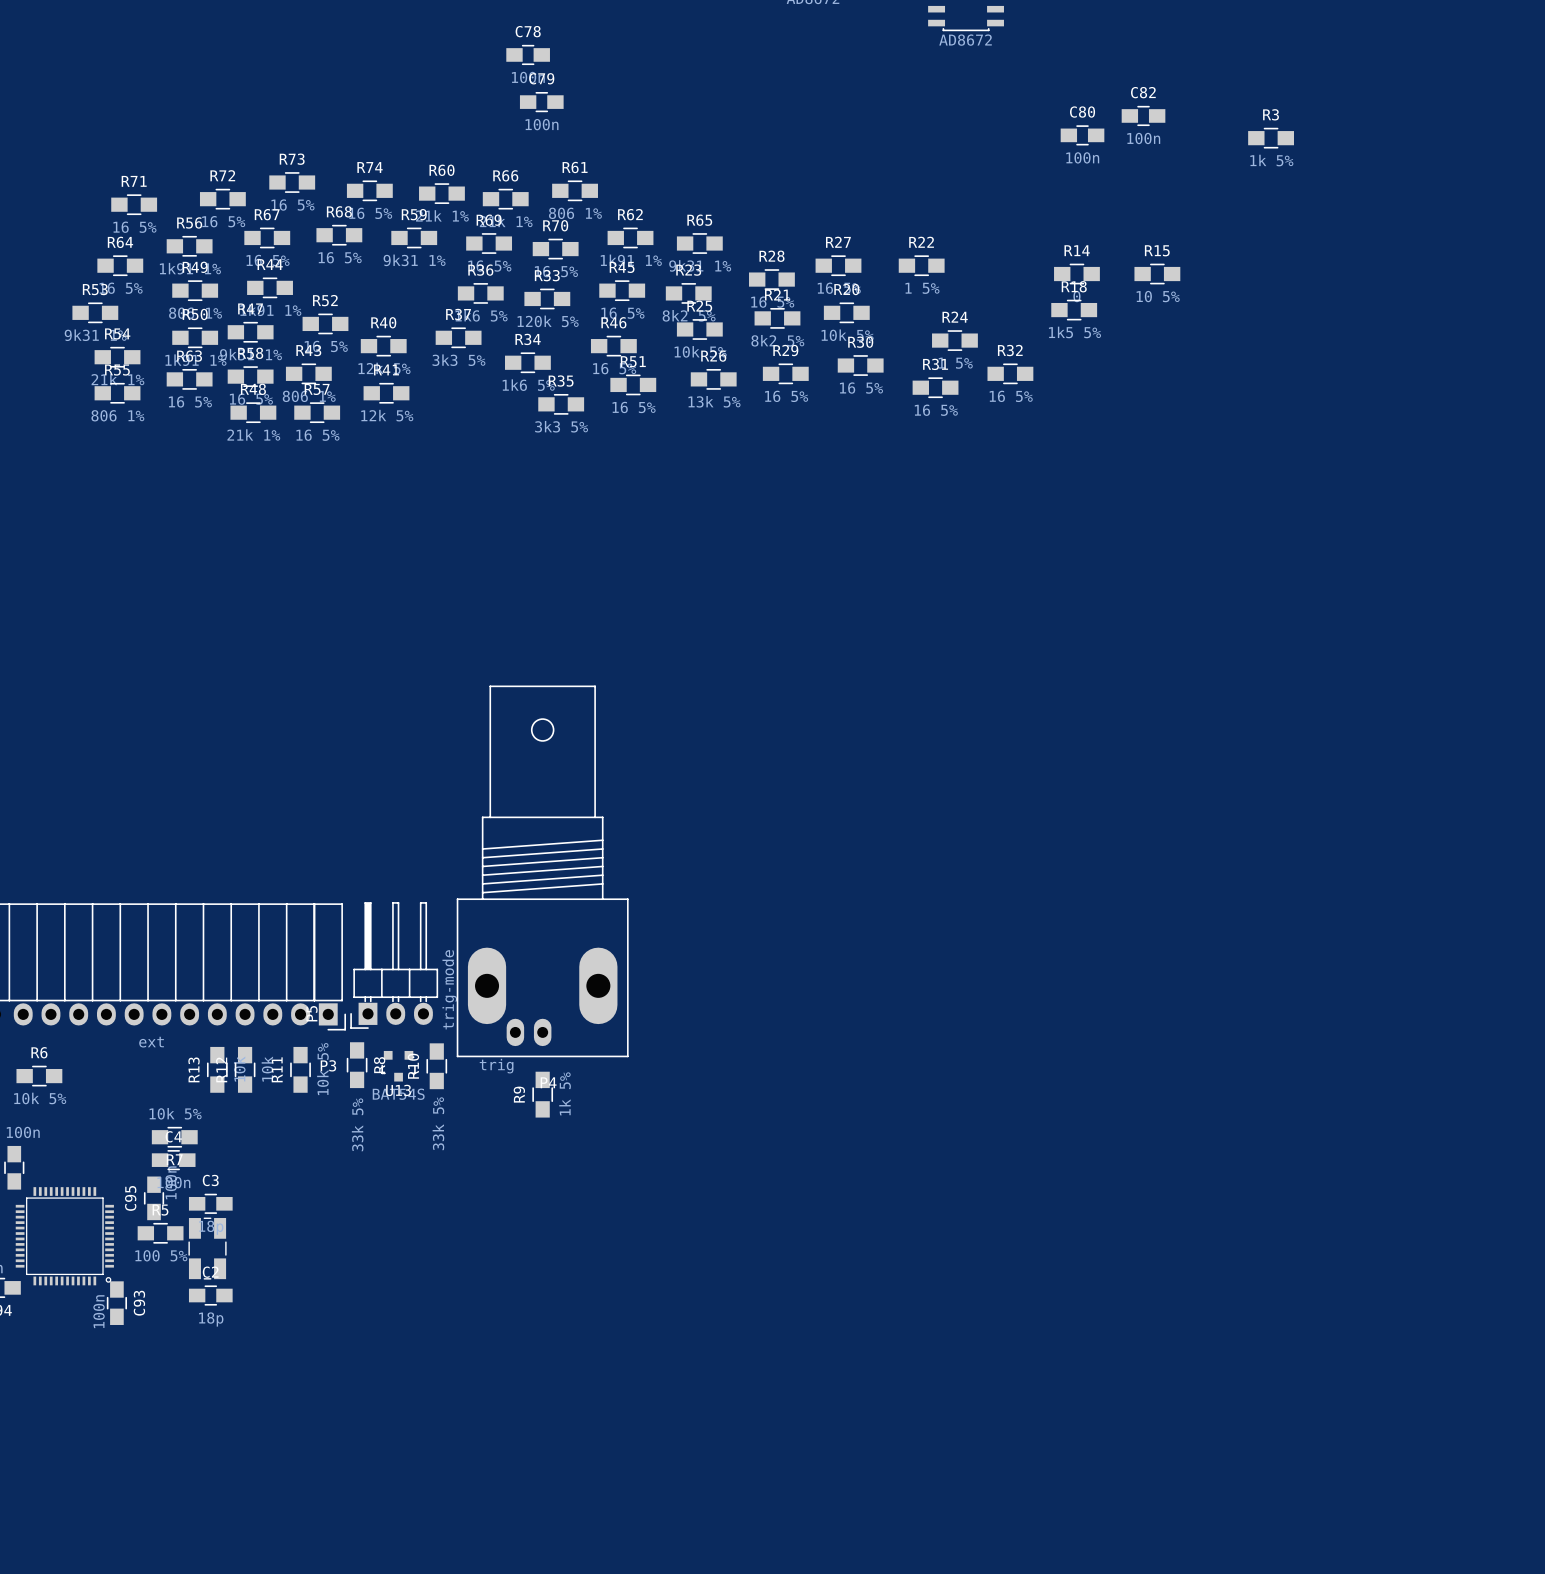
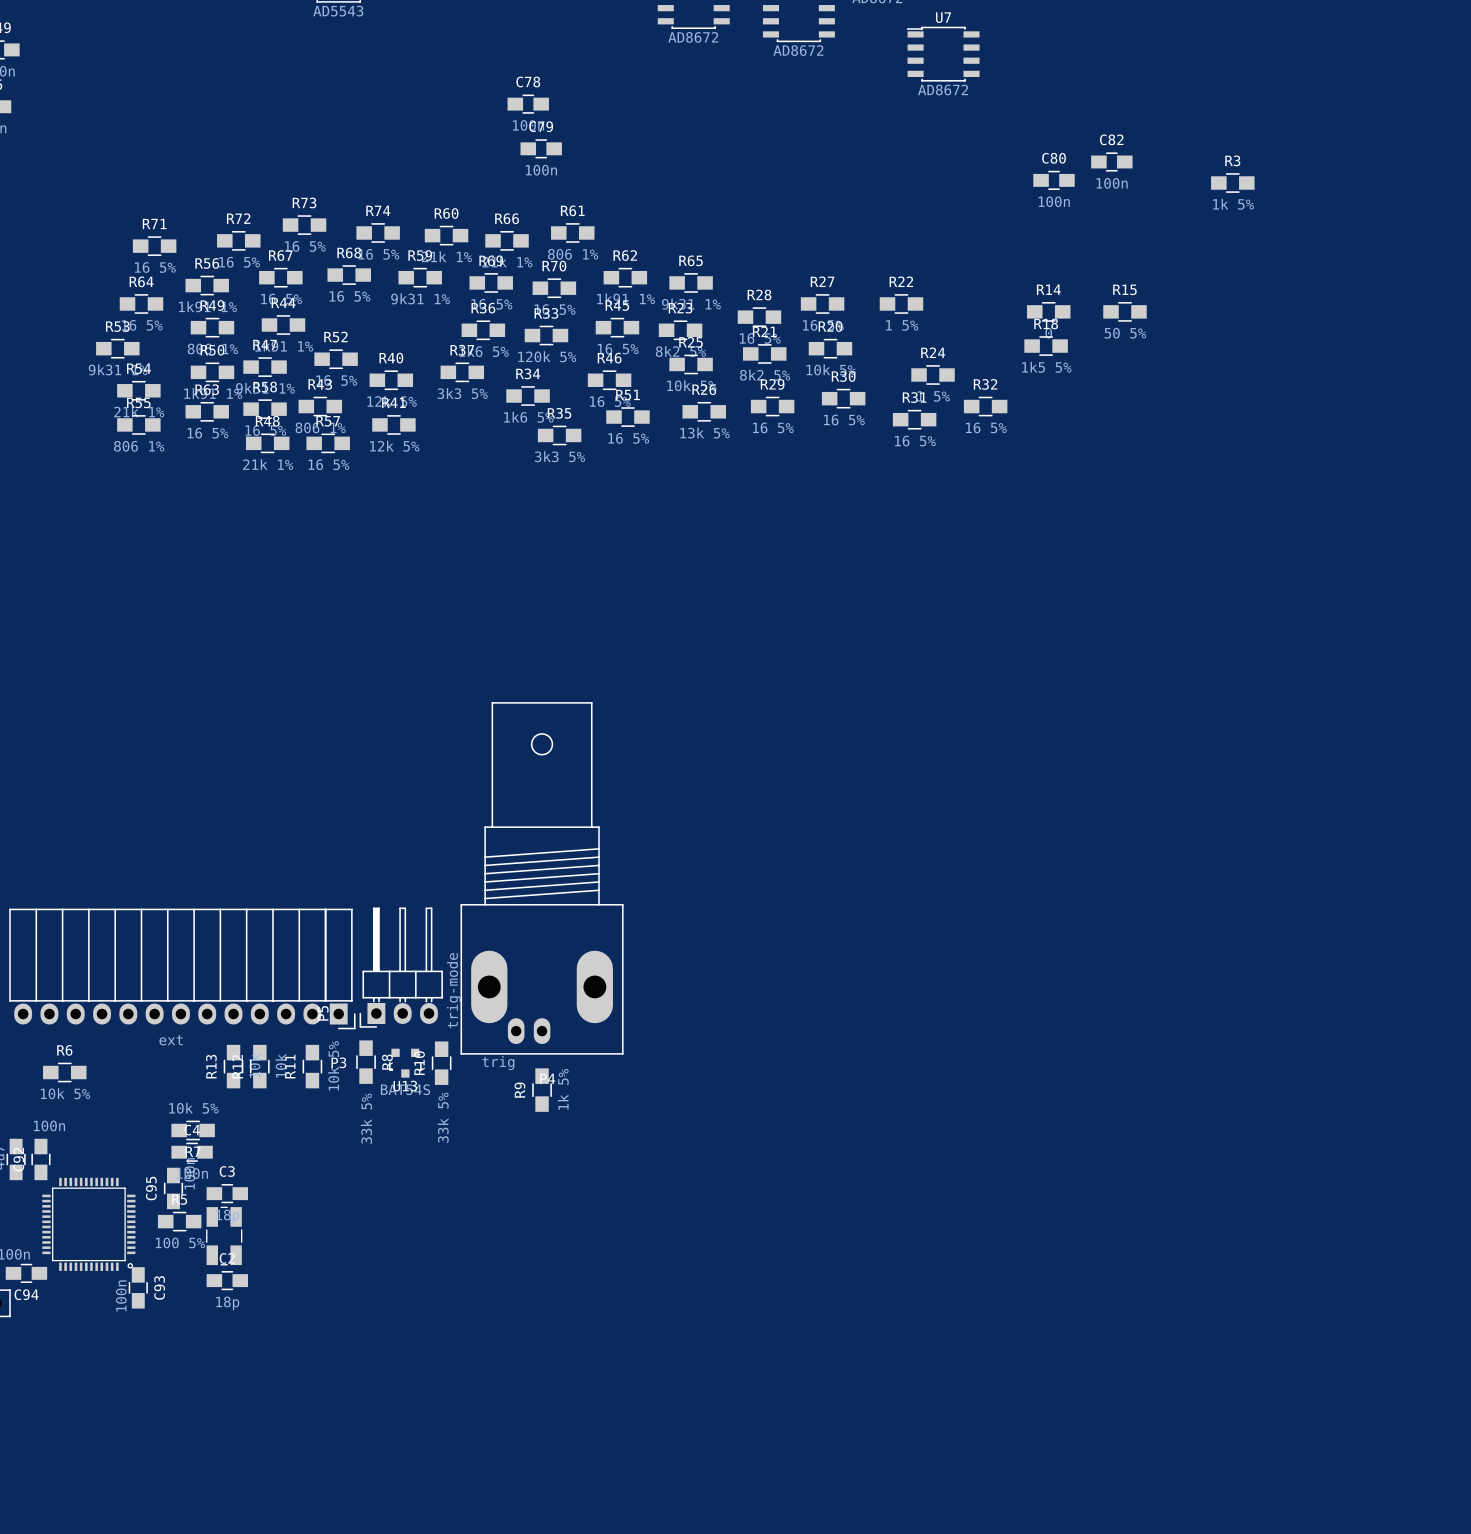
R15 value: 10 5% (1158, 296) -> 50 5% (1125, 333)

